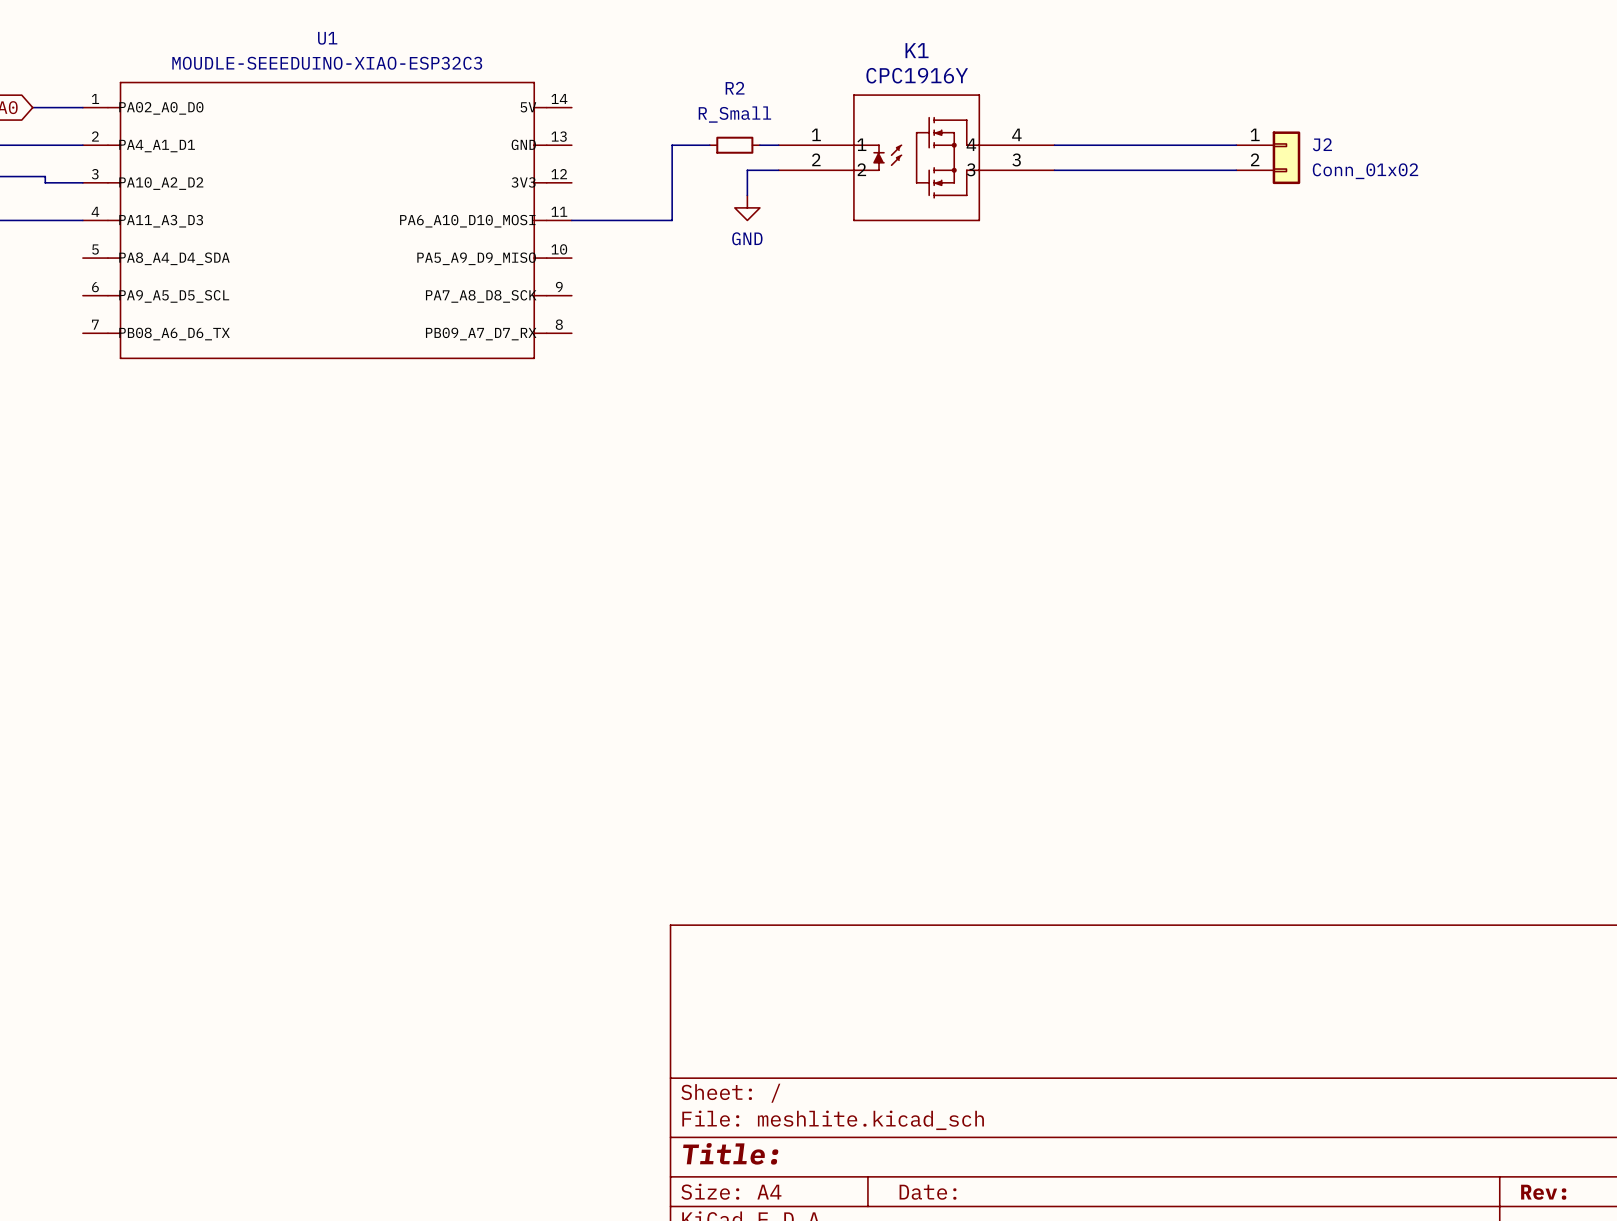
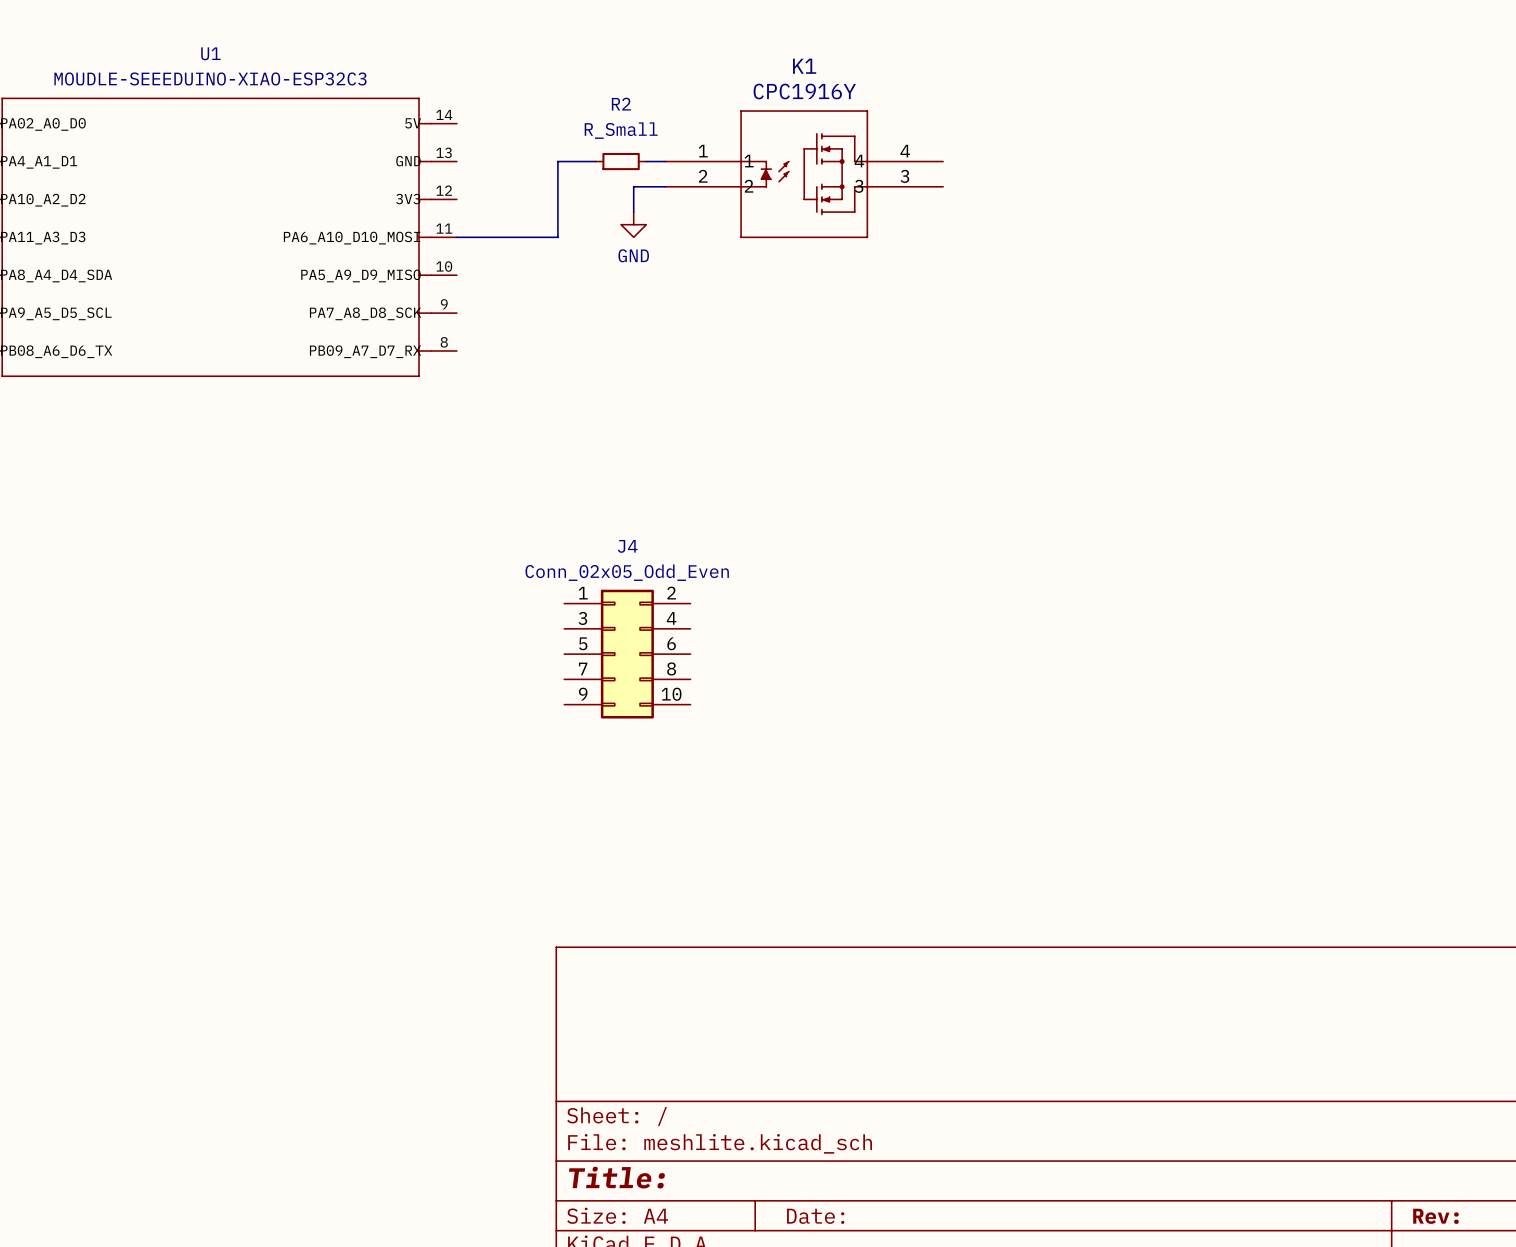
wire: (1054, 145) (1236, 145) -> none
J2: Conn_01x02 (1268, 157) -> none
wire: (1054, 170) (1236, 170) -> none
J4: none -> Conn_02x05_Odd_Even (627, 654)

